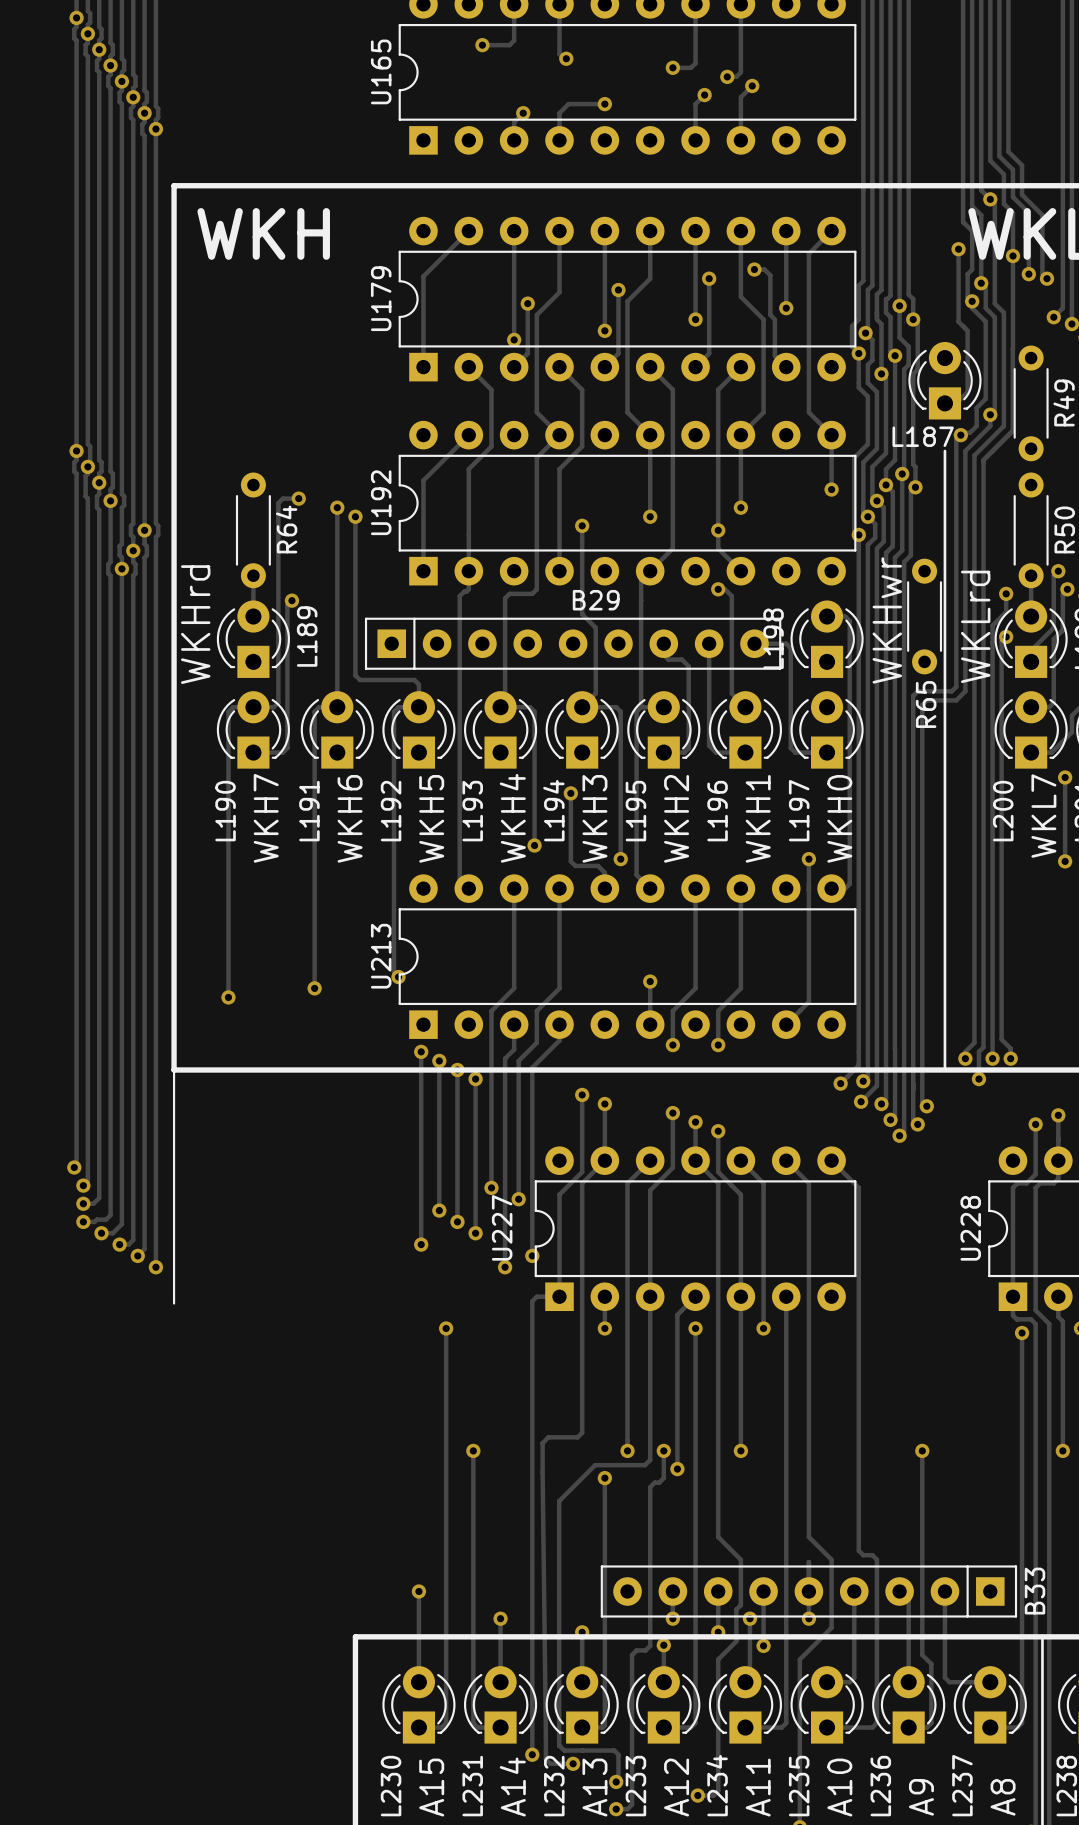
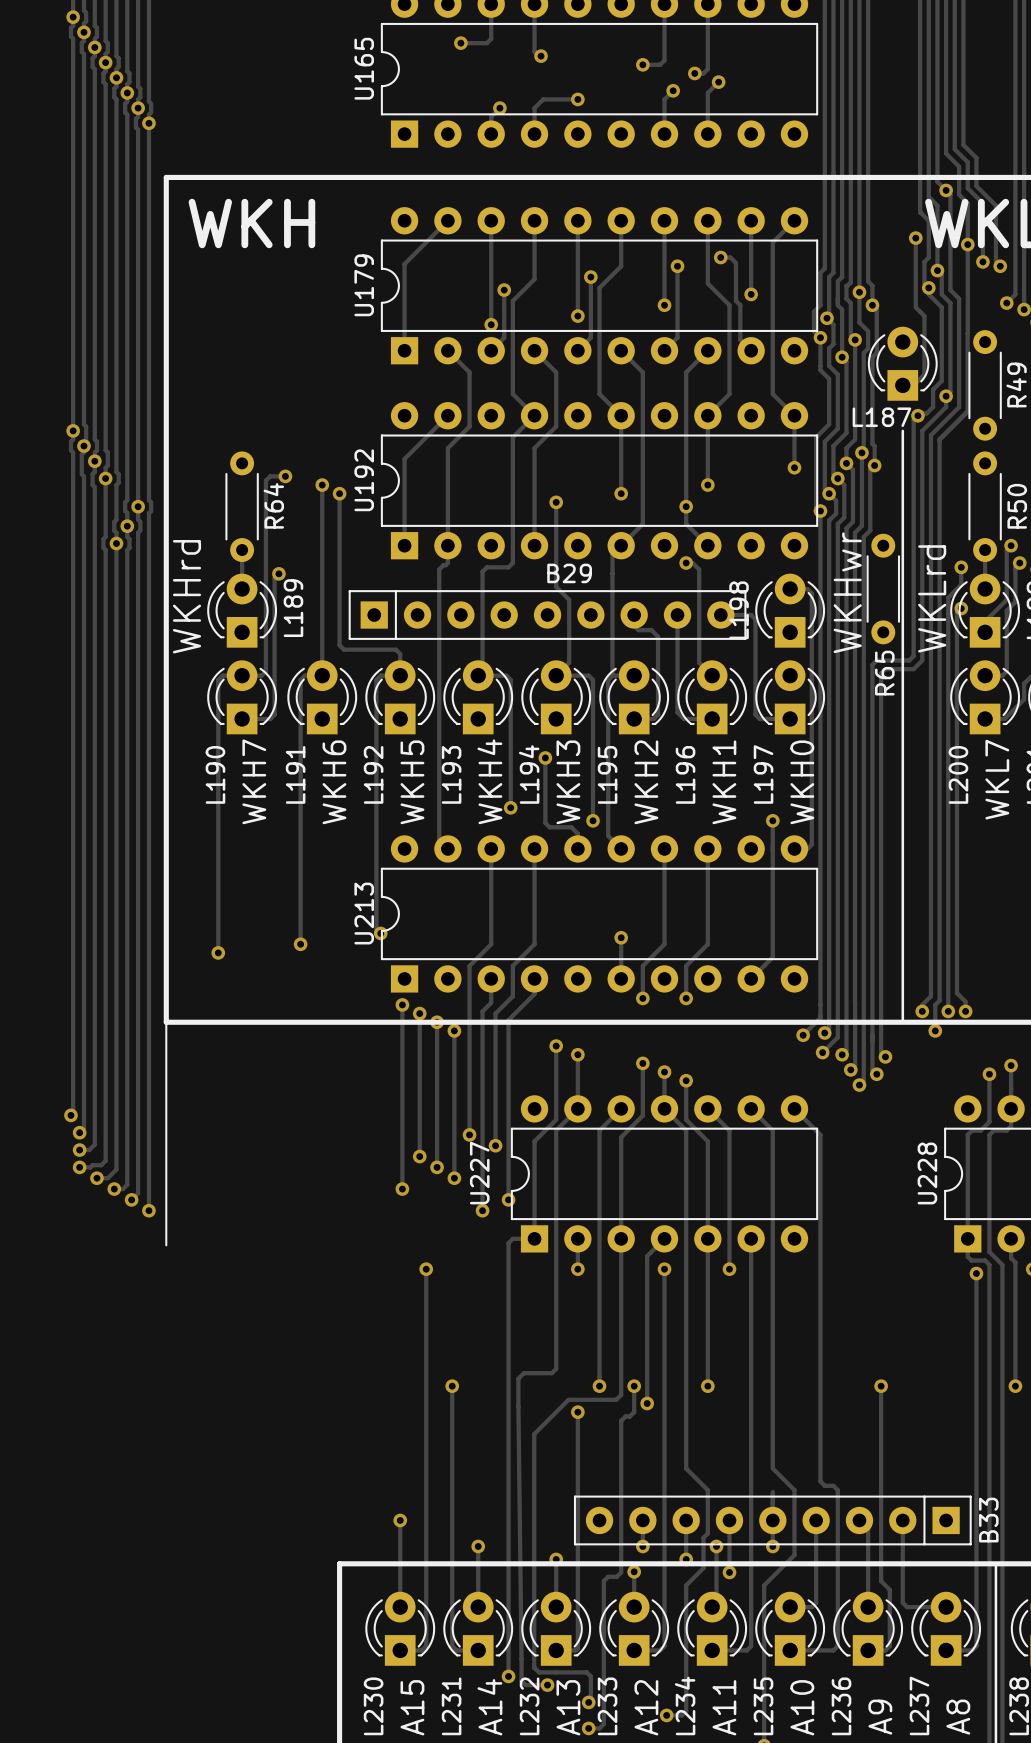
track: (1065, 777) (1065, 861) -> none
via: (1065, 777) -> none
via: (1065, 861) -> none

